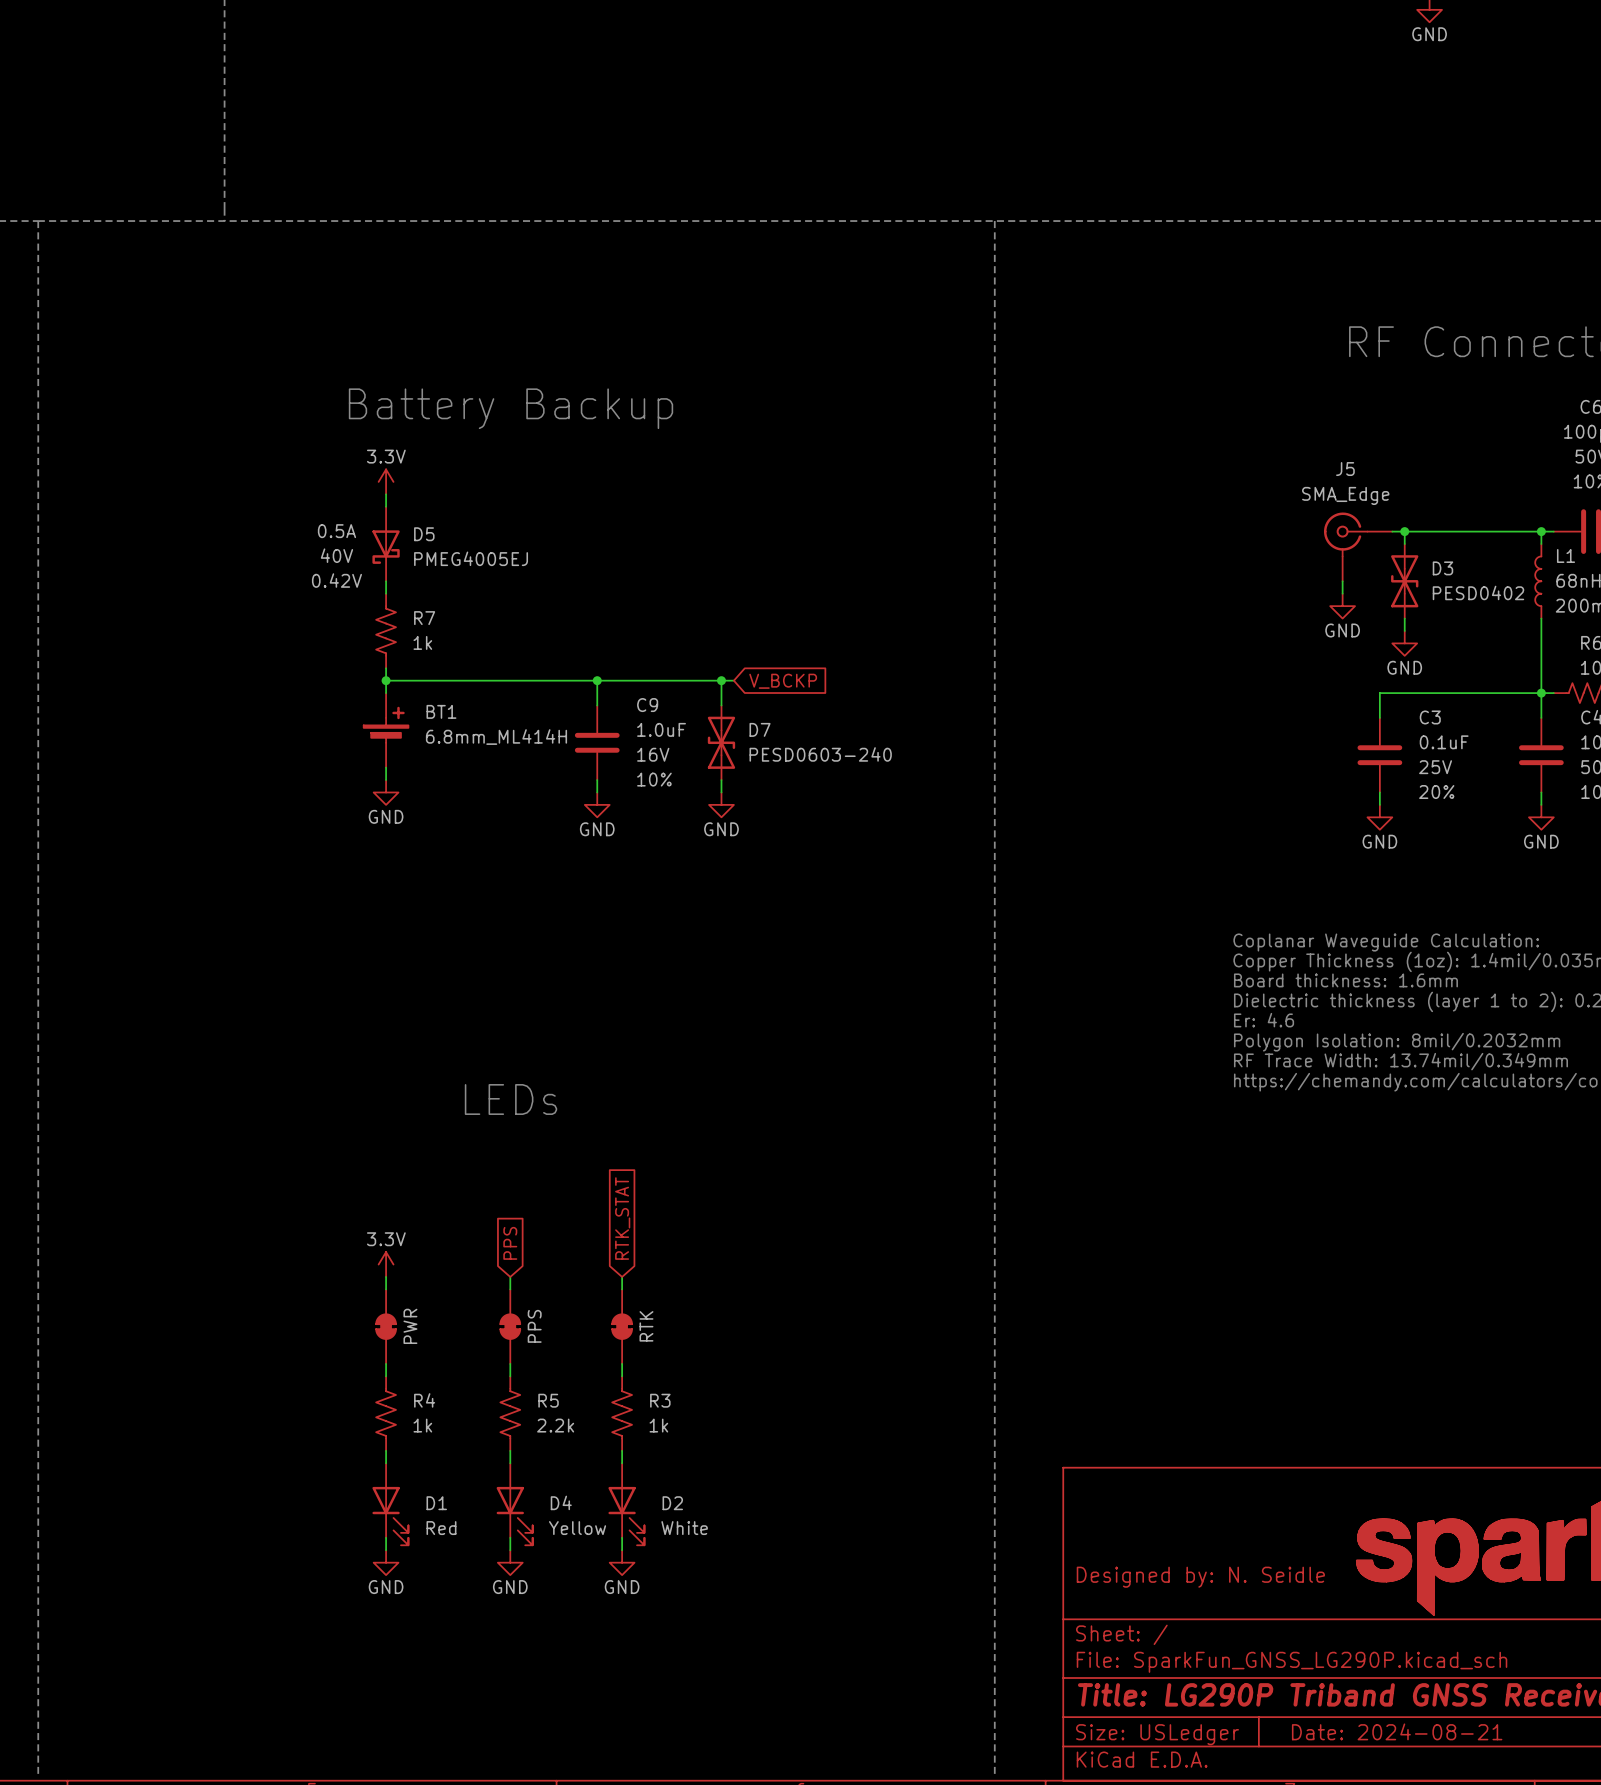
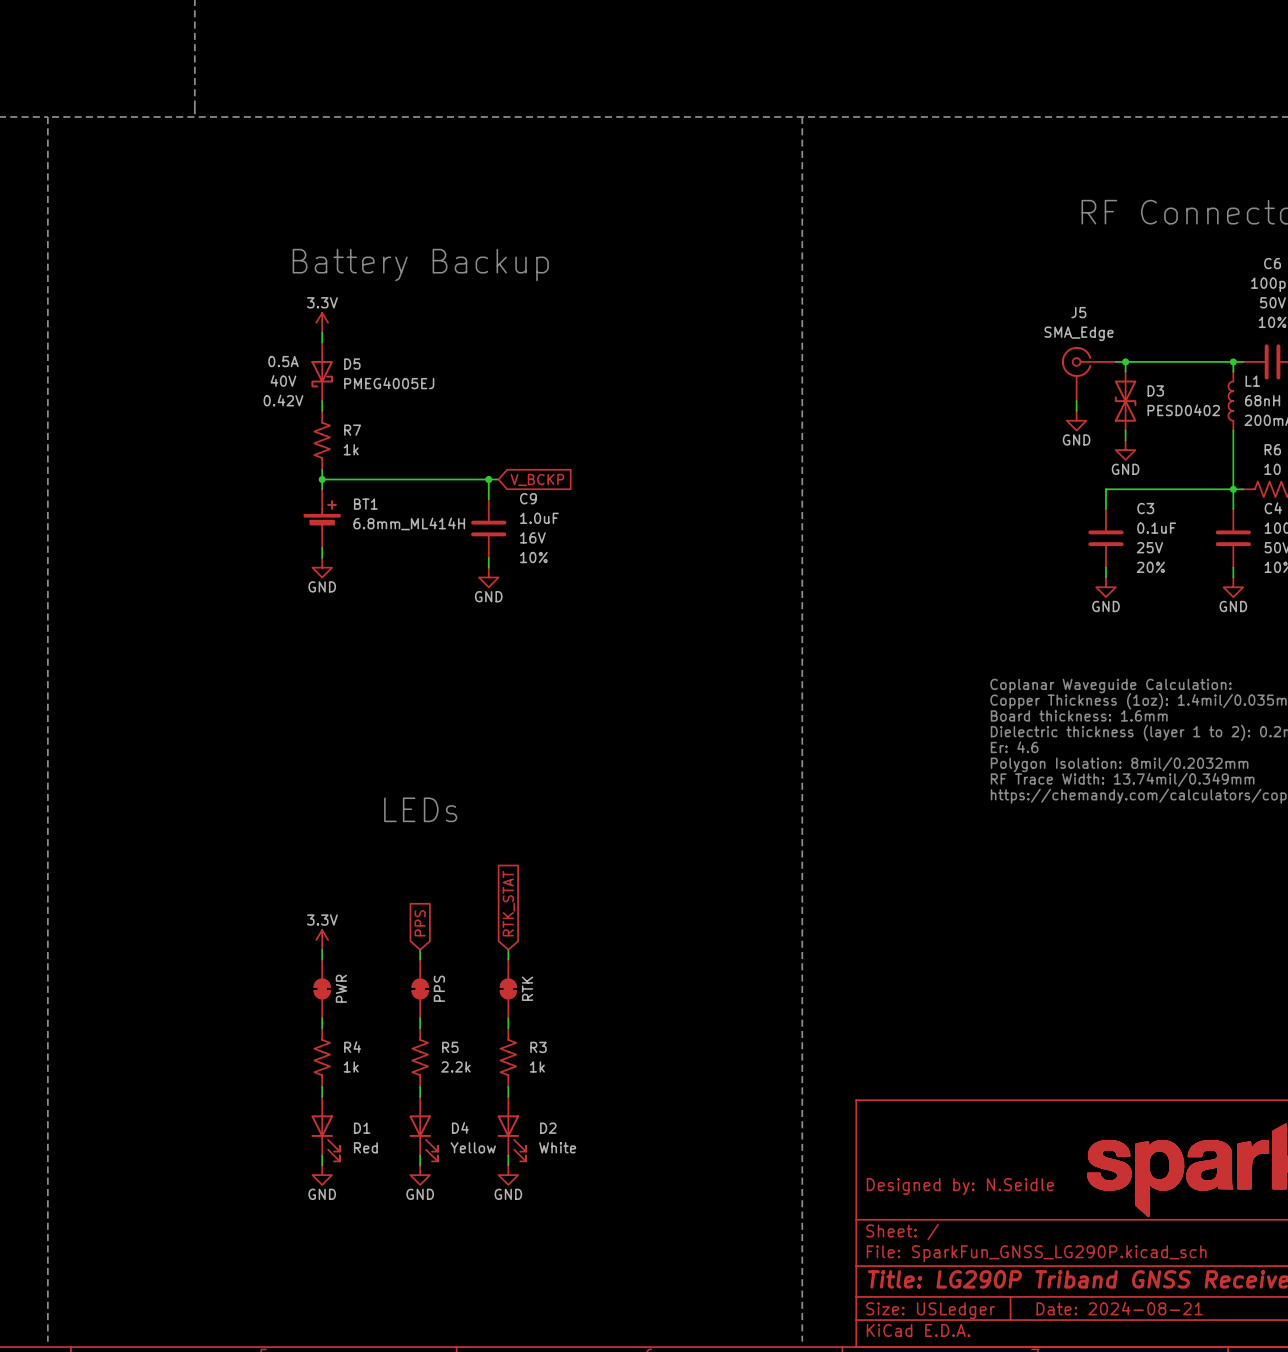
wire: (609, 680) (733, 680) -> none
wire: (721, 680) (721, 705) -> none
junction: (721, 680) -> none
global label position: V_BCKP (783, 681) -> V_BCKP (537, 479)
D7: PESD0603-240 (721, 742) -> none
wire: (721, 780) (721, 792) -> none
power symbol: GND (721, 804) -> none
title block: Designed by: N. Seidle (1200, 1577) -> Designed by: N.Seidle (960, 1186)

